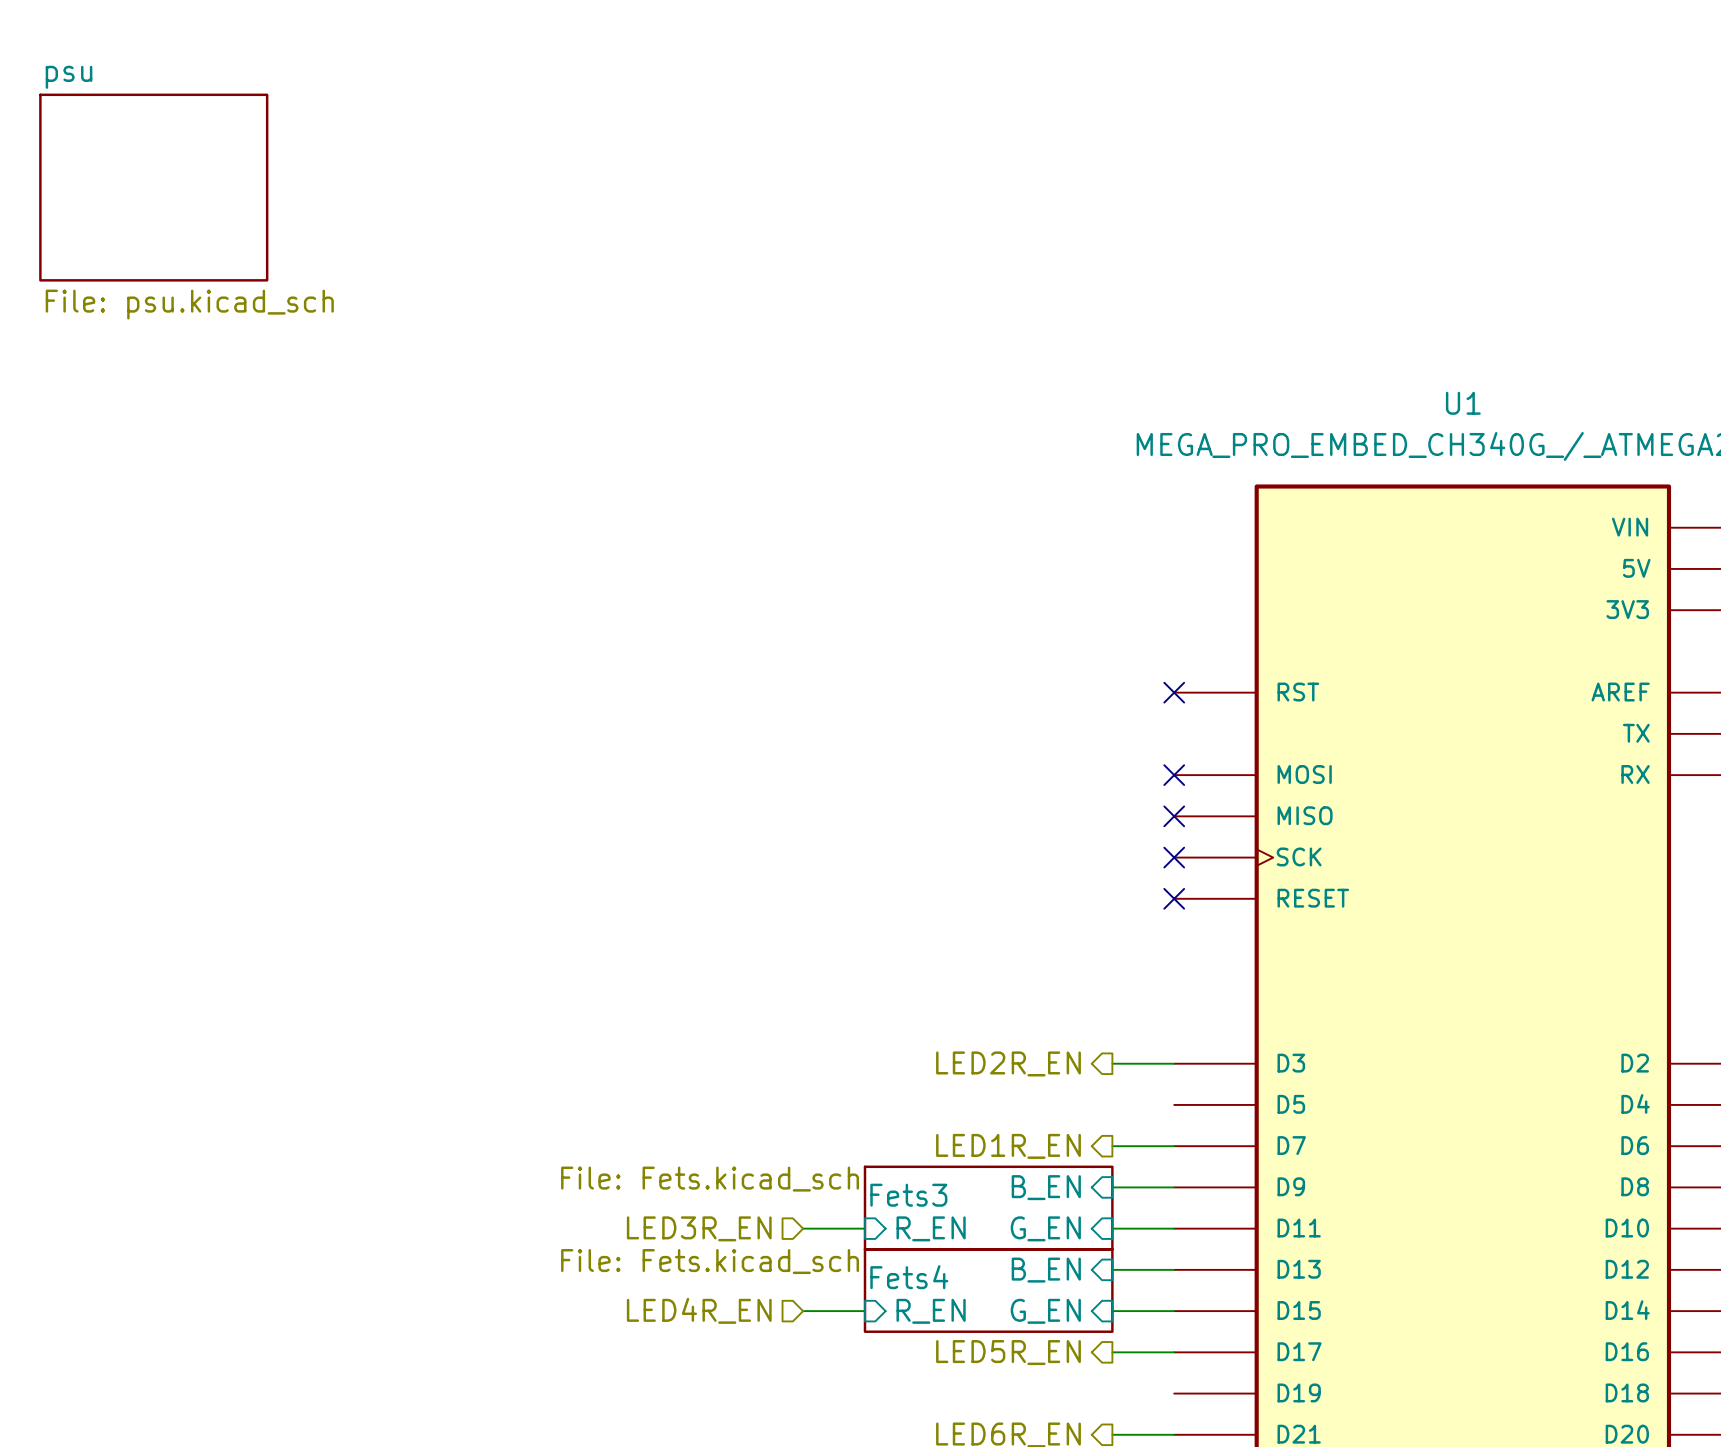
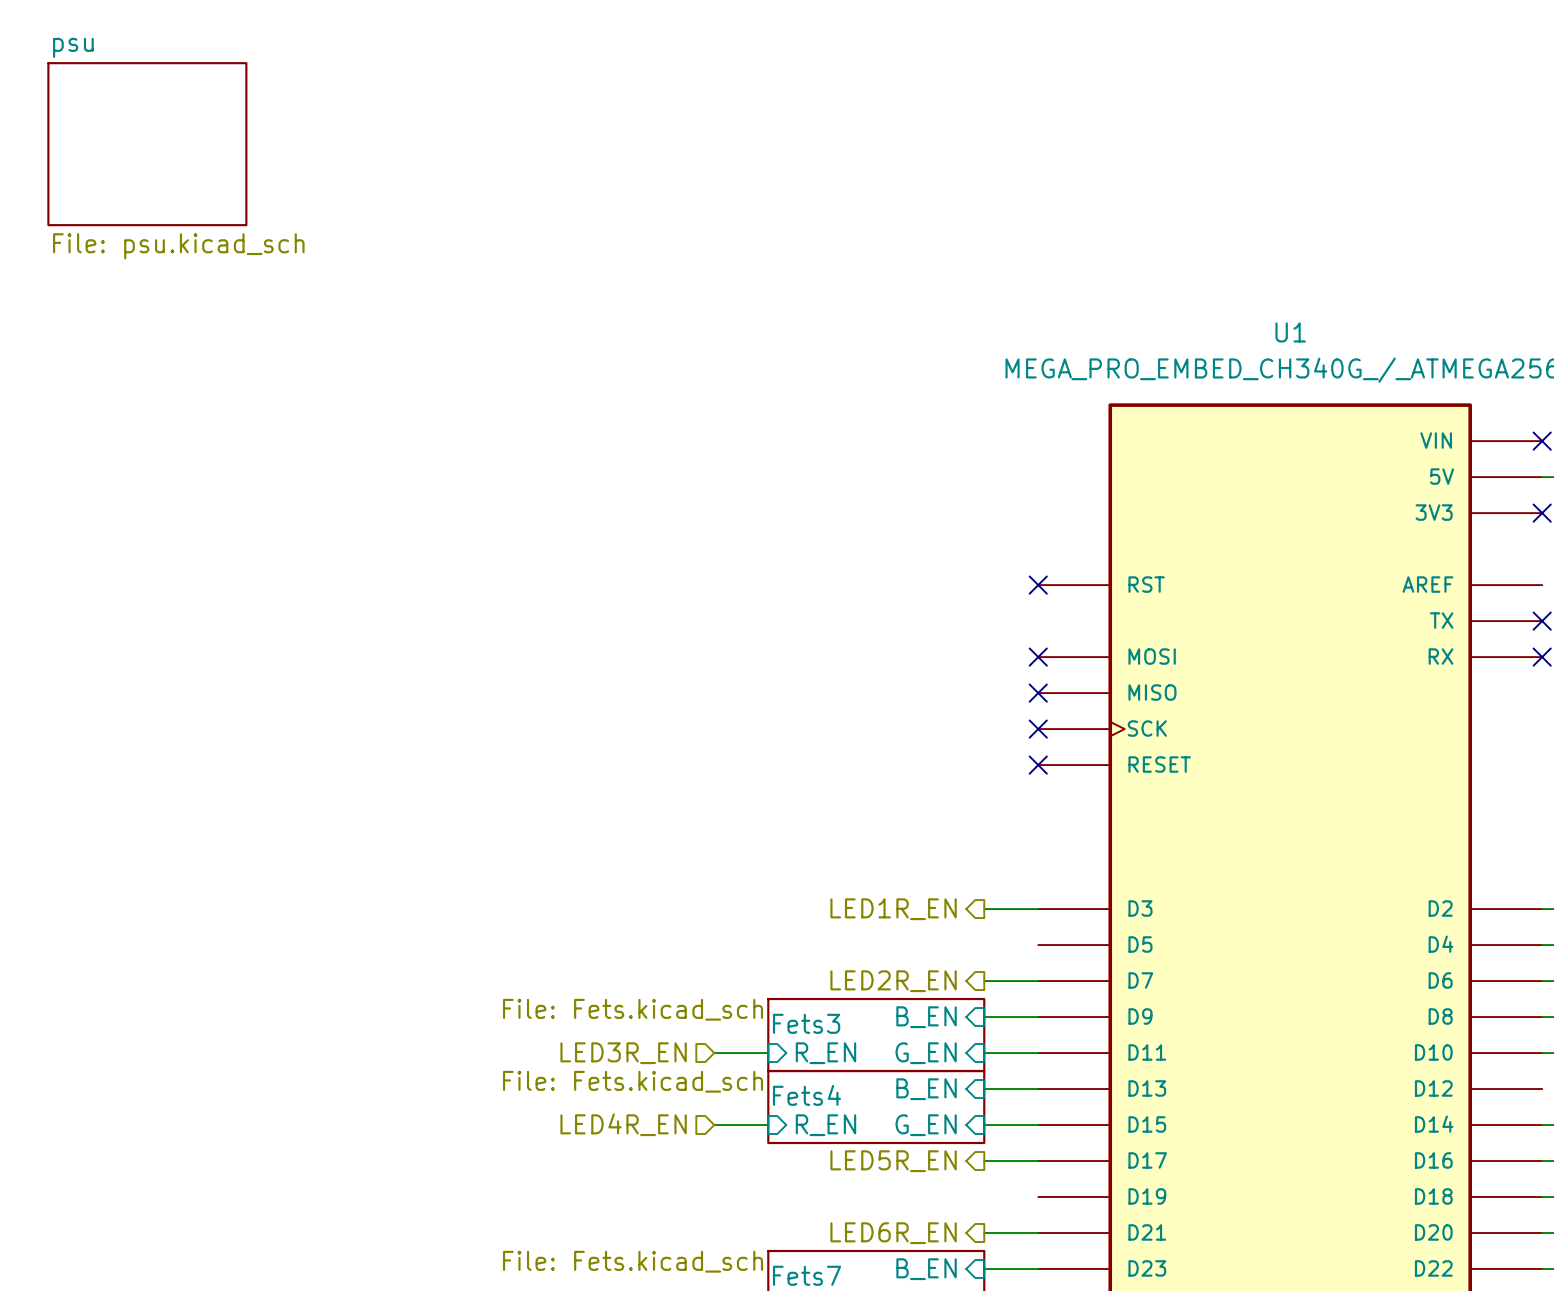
hierarchical label: LED2R_EN (1008, 1063) -> LED1R_EN (893, 909)
hierarchical label: LED1R_EN (1008, 1146) -> LED2R_EN (893, 981)

